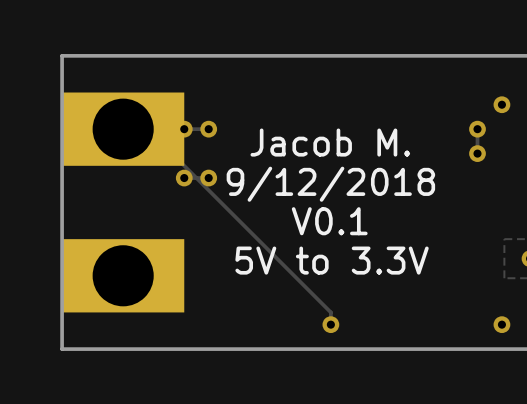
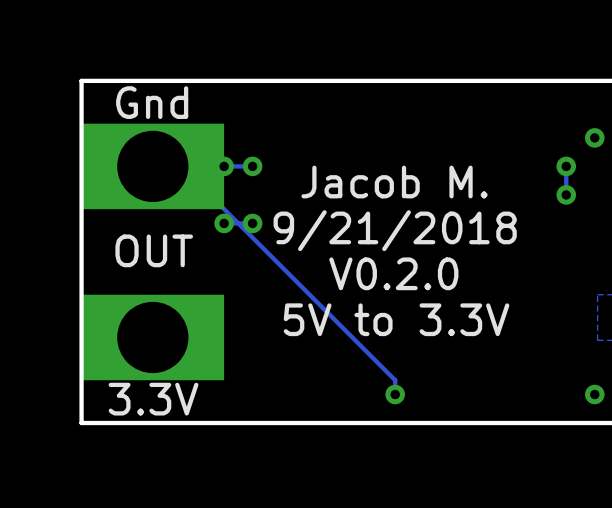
text: none -> Gnd (152, 102)
text: 9/12/2018 (330, 184) -> 9/21/2018 (395, 230)
text: none -> OUT (154, 250)
text: V0.1 (329, 221) -> V0.2.0 (393, 273)
text: none -> 3.3V (153, 399)

